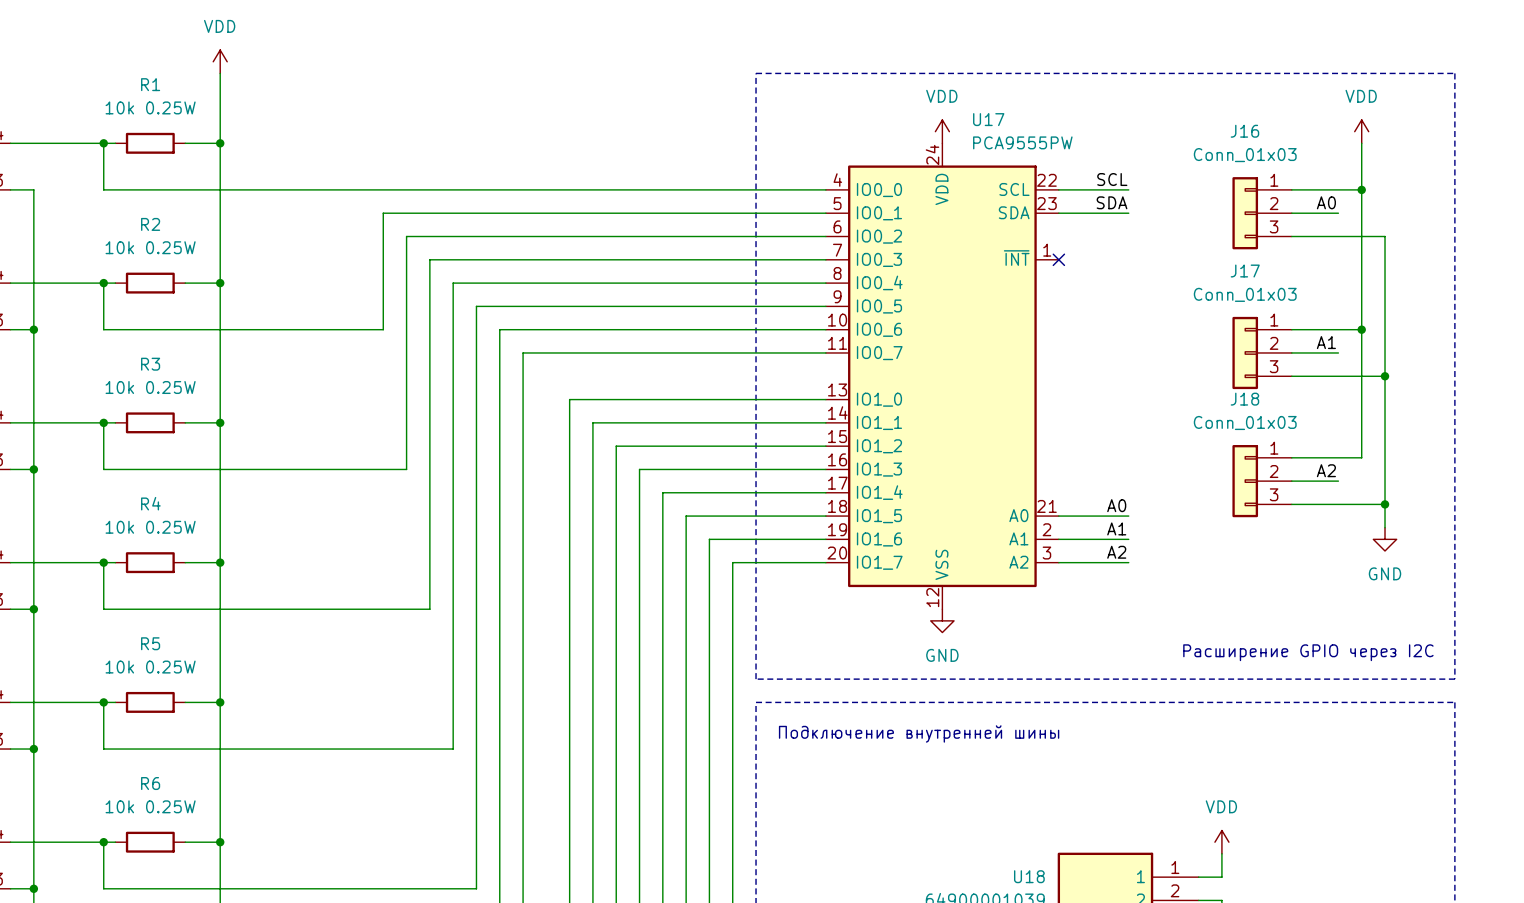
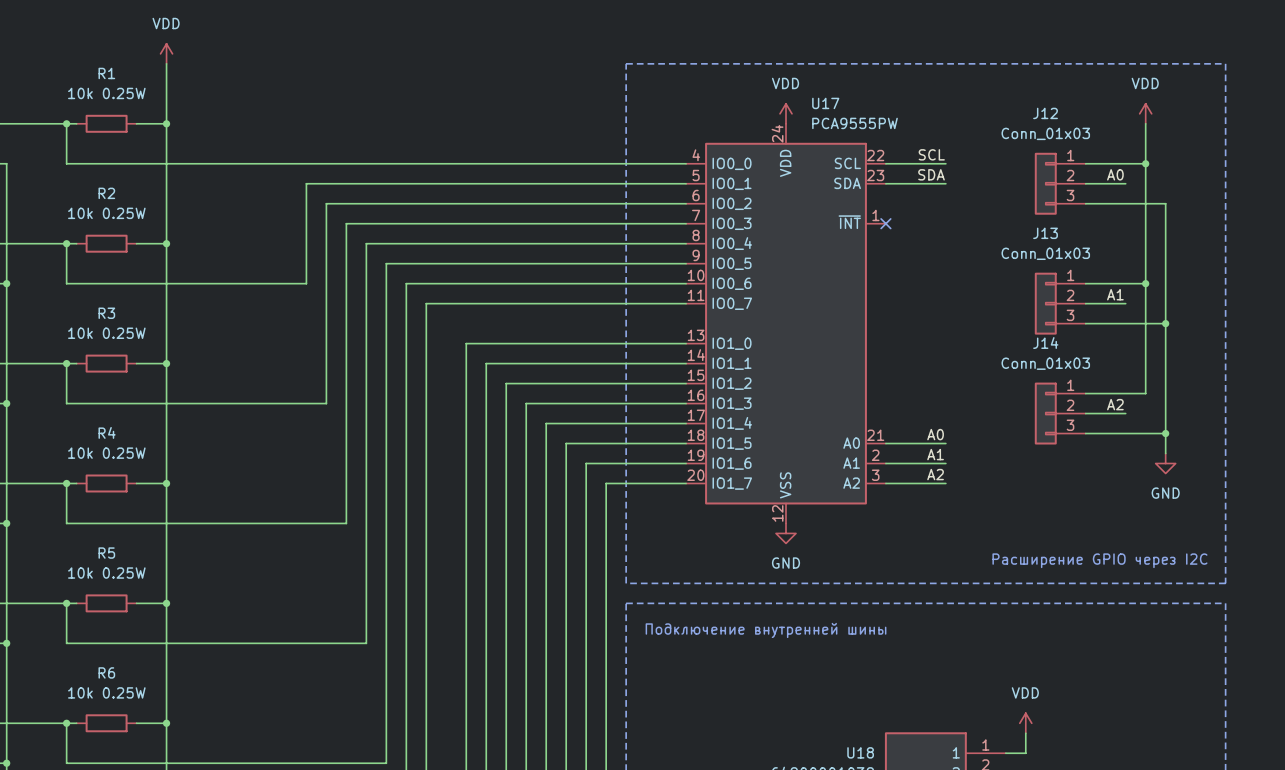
J16 name: J16 (1244, 131) -> J12 (1045, 113)
J17 name: J17 (1245, 271) -> J13 (1045, 233)
J18 name: J18 (1244, 399) -> J14 (1045, 343)

